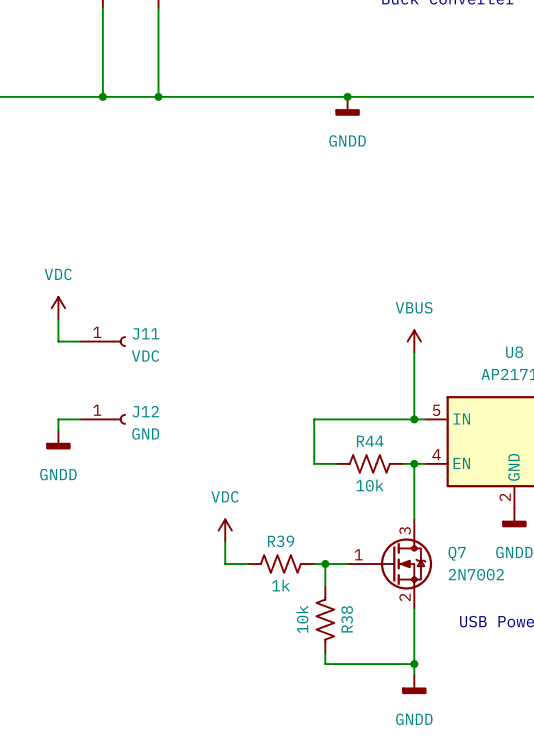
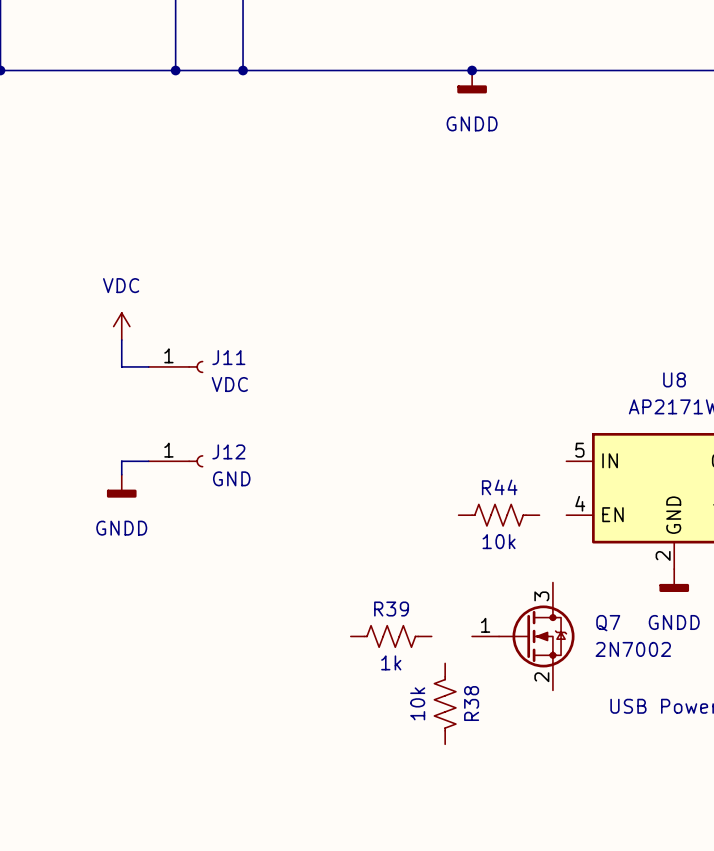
power symbol: VBUS (414, 341) -> none
wire: (414, 352) (414, 419) -> none
junction: (414, 419) -> none
wire: (425, 419) (314, 419) (314, 463) (336, 463) -> none
wire: (403, 463) (425, 463) -> none
wire: (414, 463) (414, 519) -> none
junction: (414, 463) -> none
power symbol: VDC (225, 530) -> none
wire: (225, 541) (225, 564) (247, 564) -> none
wire: (314, 564) (347, 564) -> none
wire: (325, 564) (325, 586) -> none
junction: (325, 564) -> none
wire: (414, 608) (414, 675) -> none
wire: (325, 652) (325, 664) (414, 664) -> none
junction: (414, 664) -> none
power symbol: GNDD (414, 684) -> none

